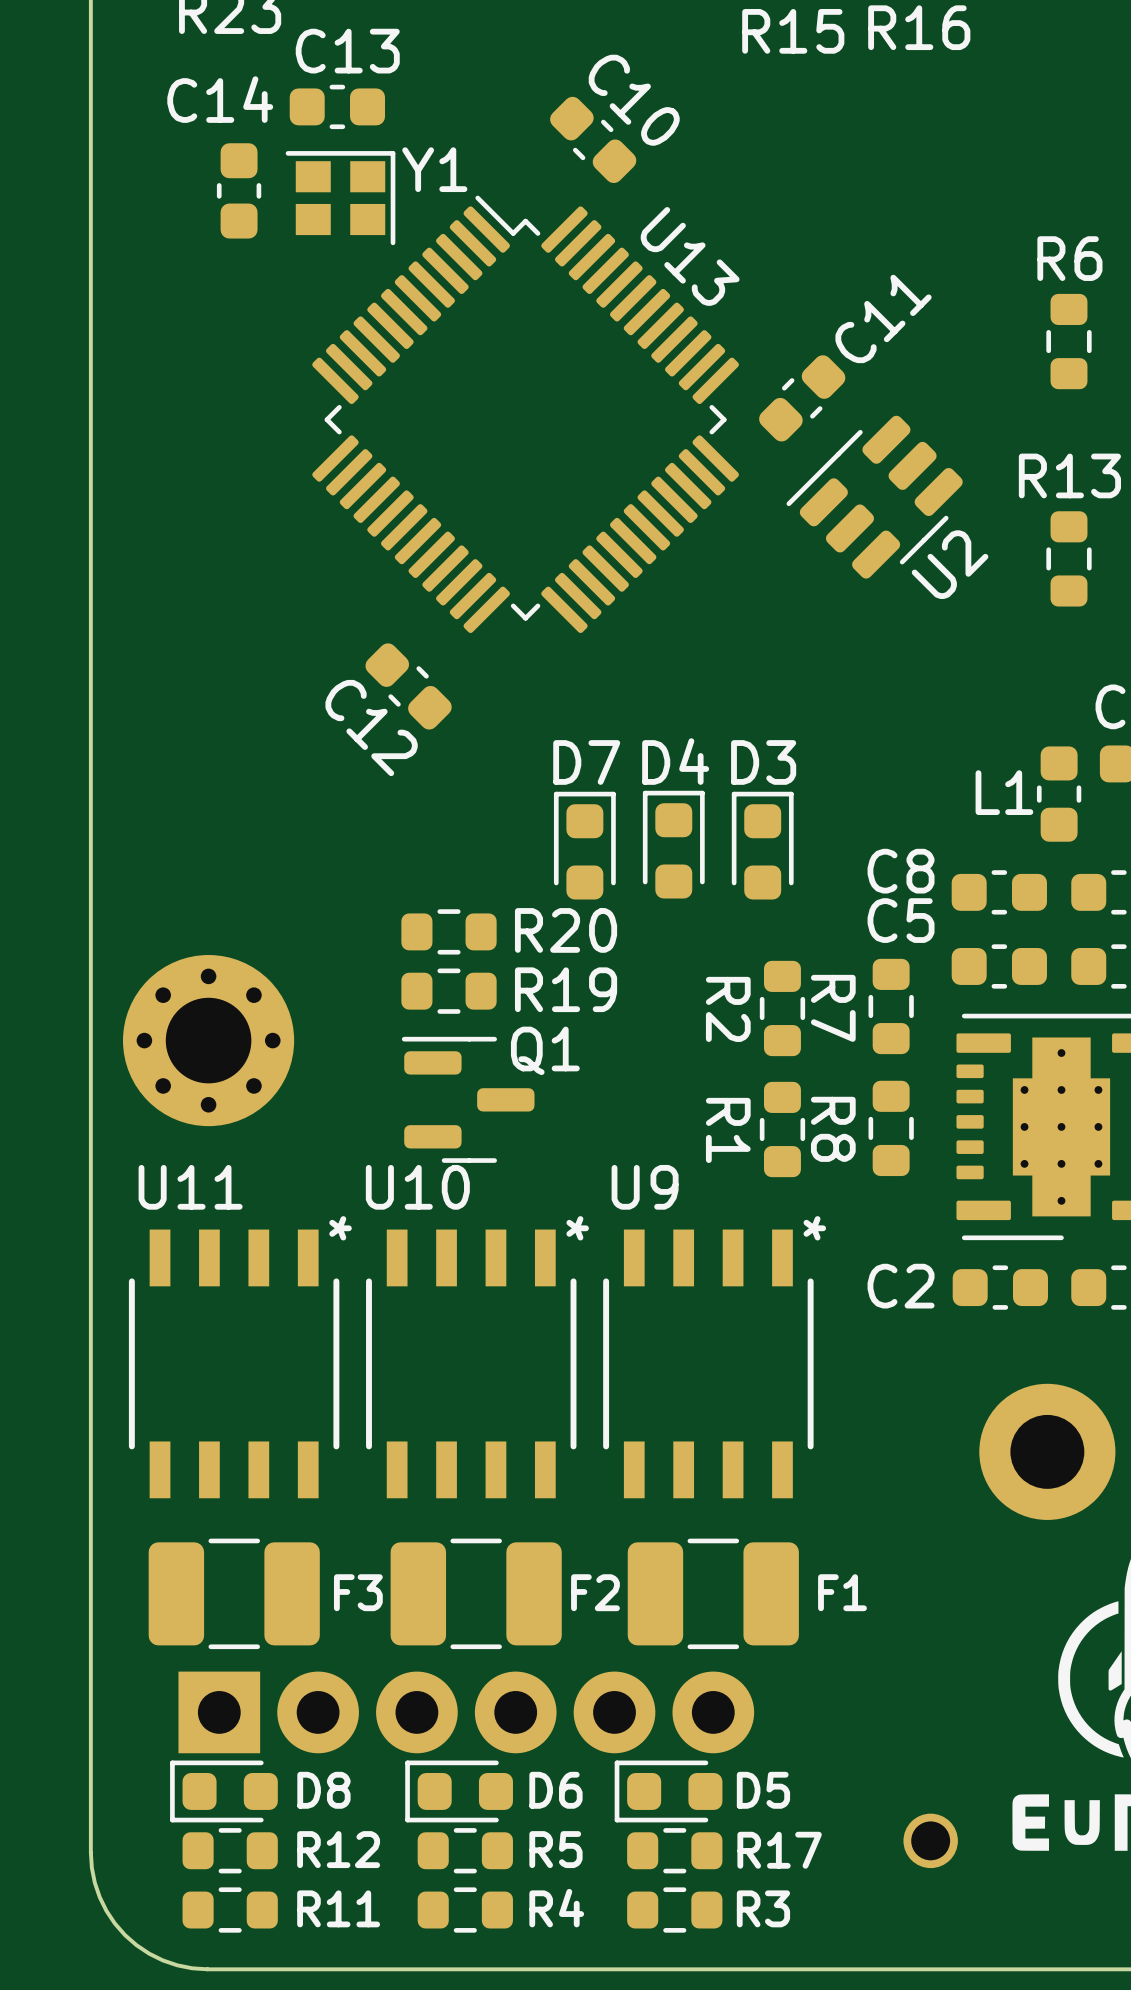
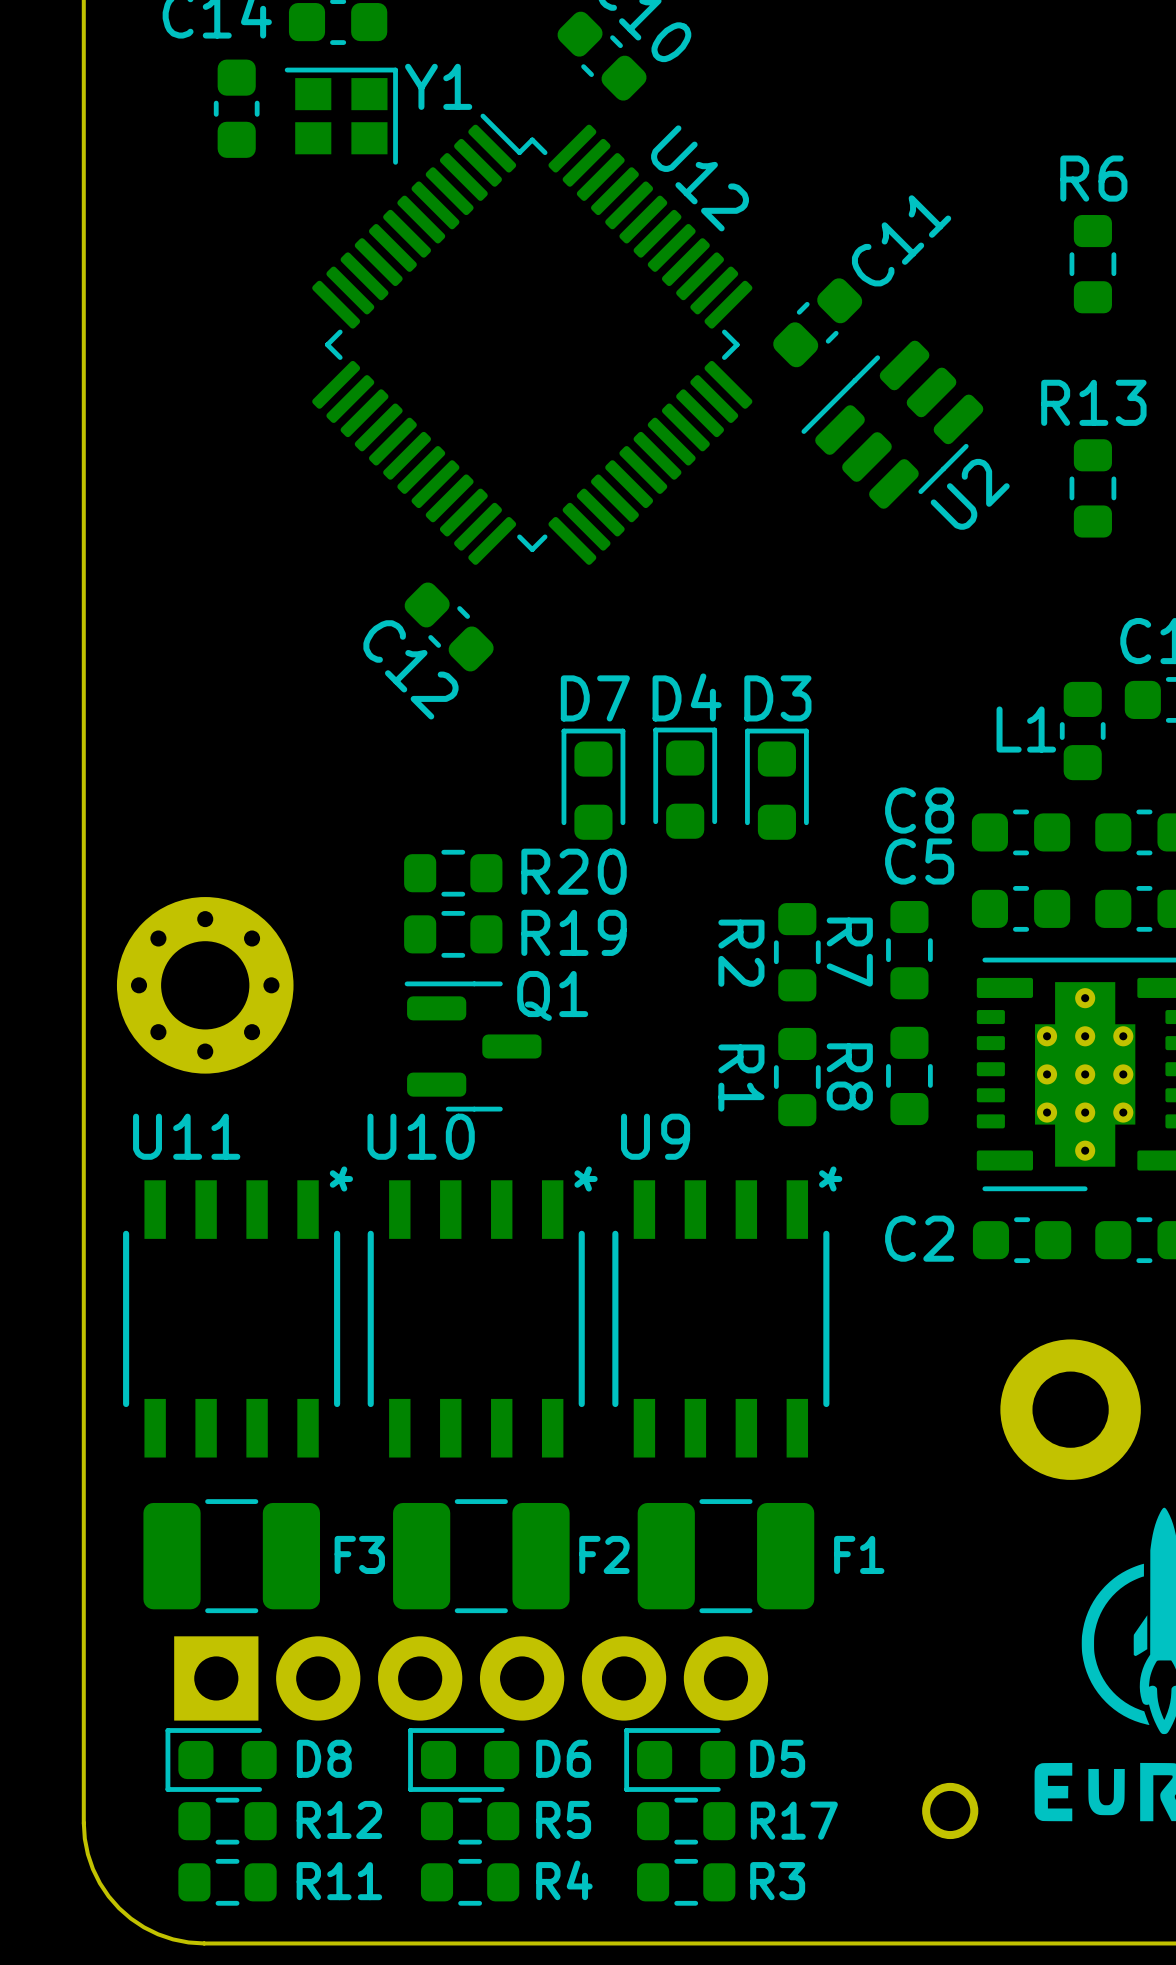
U13 name: U13 (690, 256) -> U12 (700, 178)
C12 position: (408, 686) -> (449, 626)

